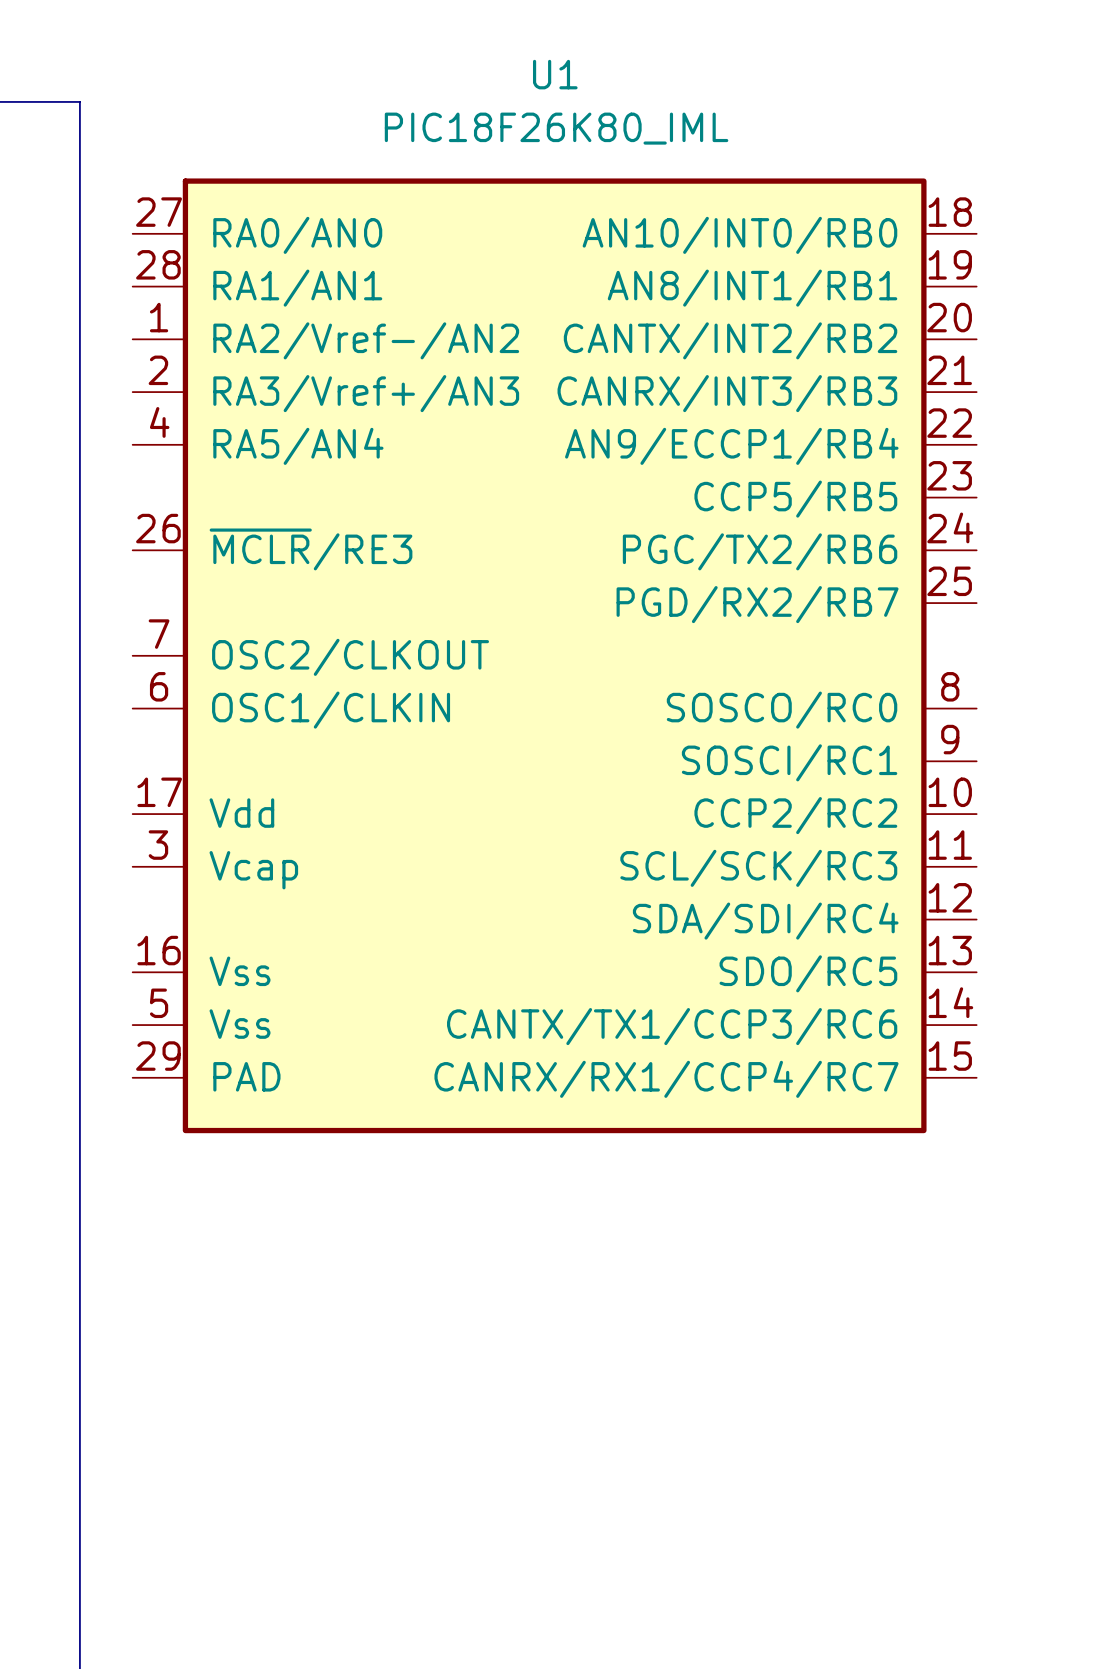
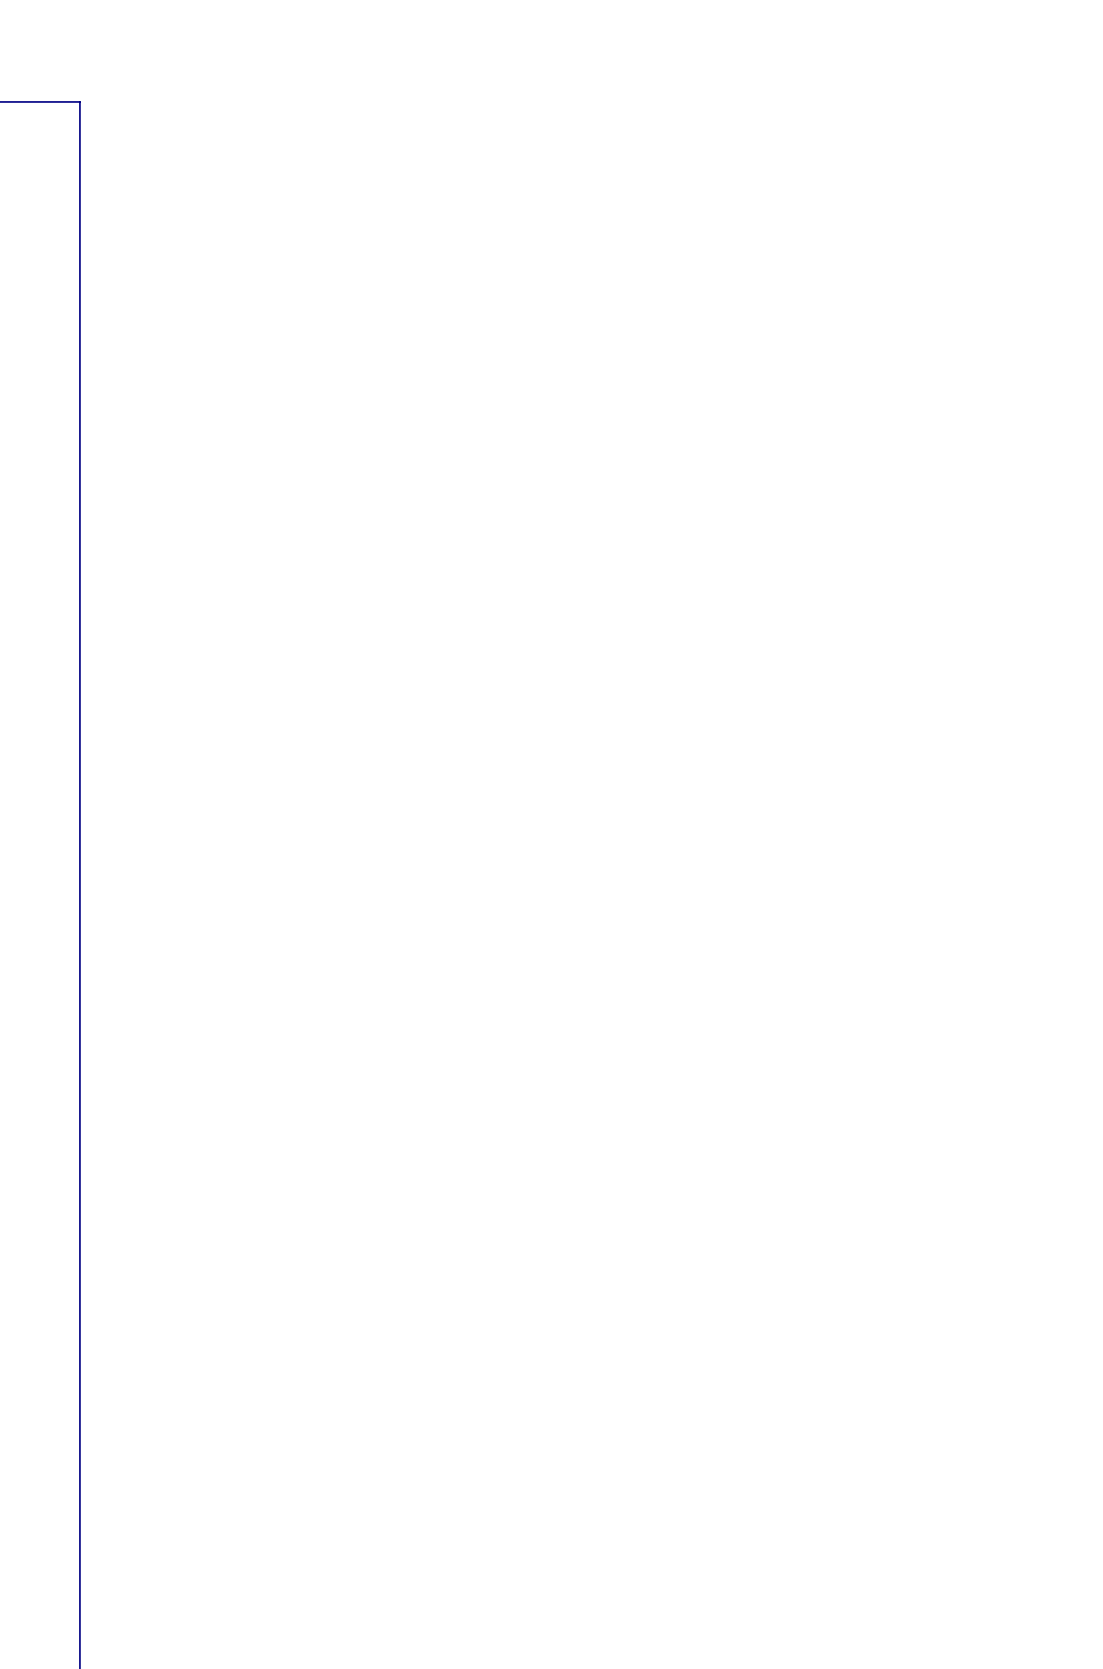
U1: PIC18F26K80_IML (554, 655) -> none

